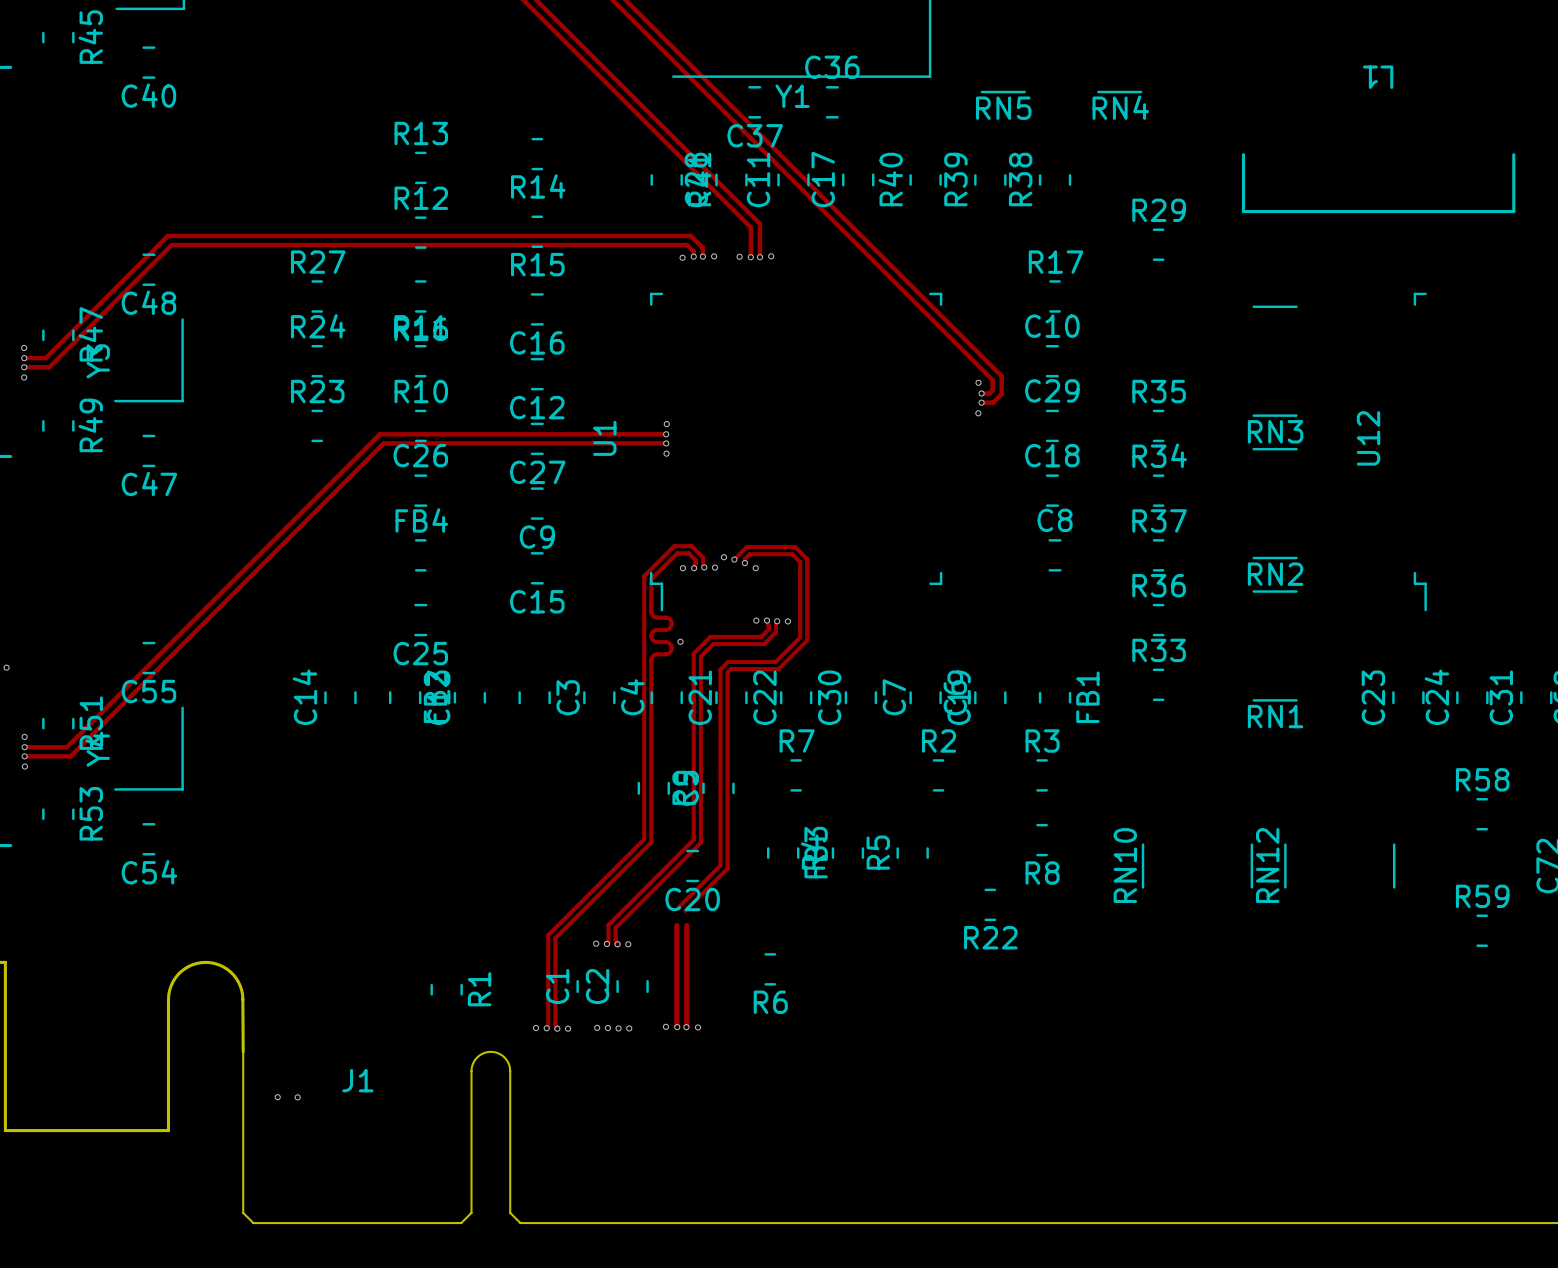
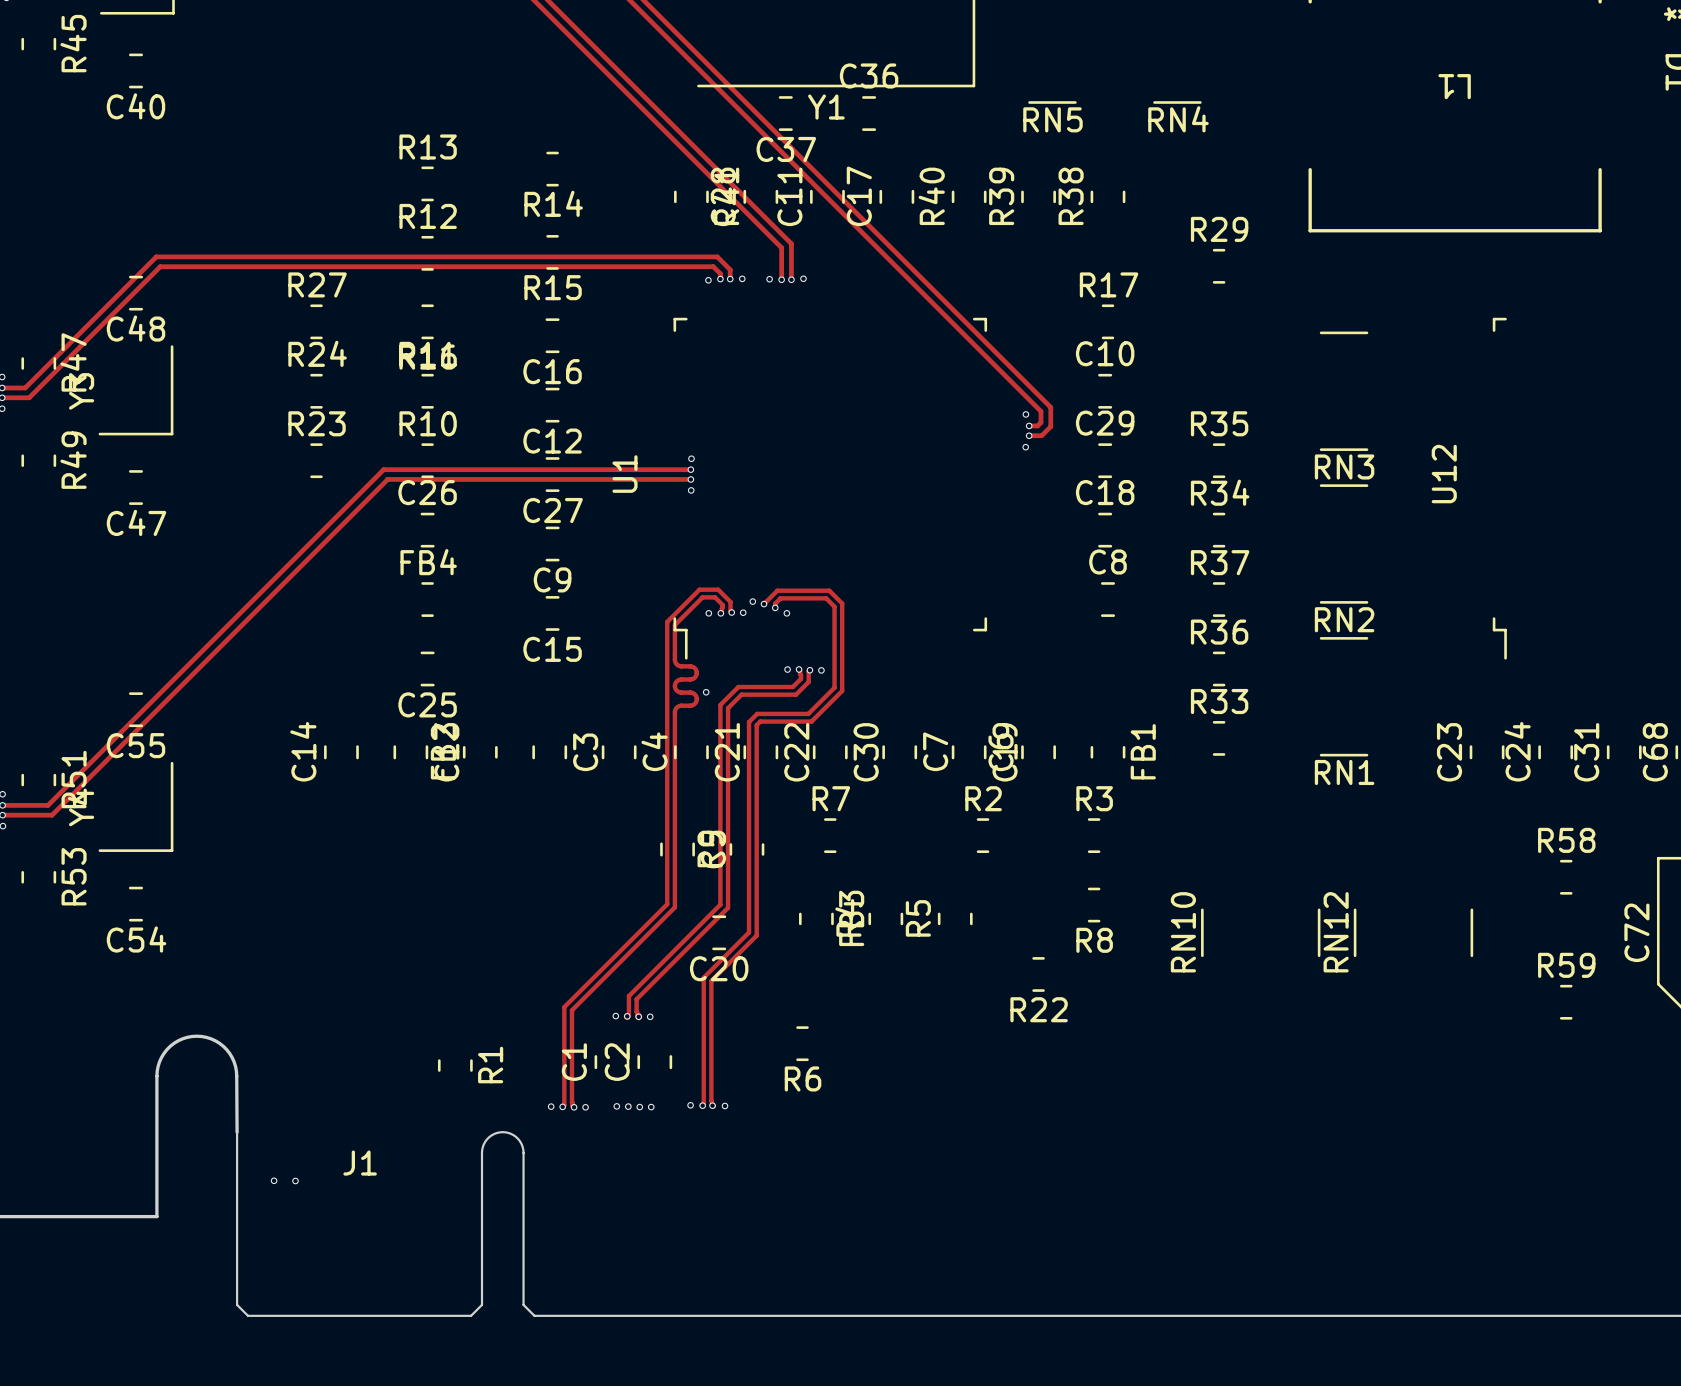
track: (676, 925) (677, 1027) -> (703, 977) (702, 1104)
track: (686, 925) (686, 1027) -> (711, 980) (712, 1104)

